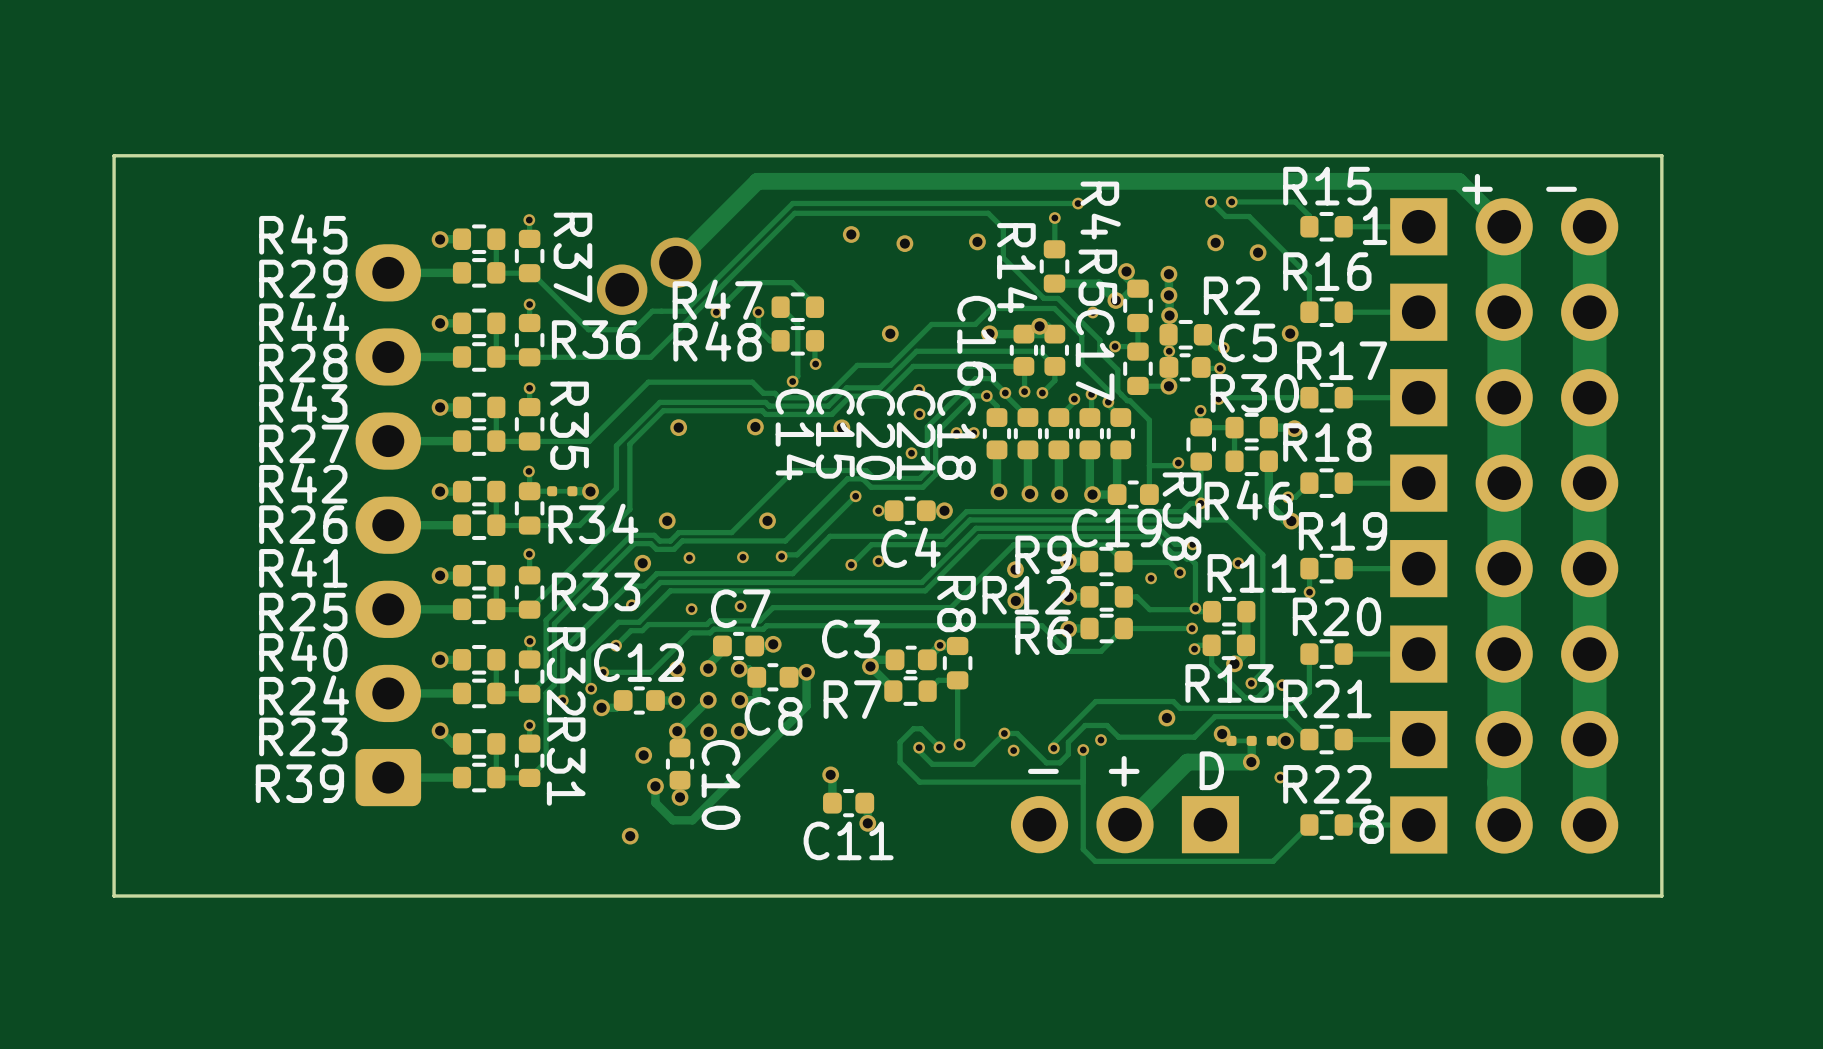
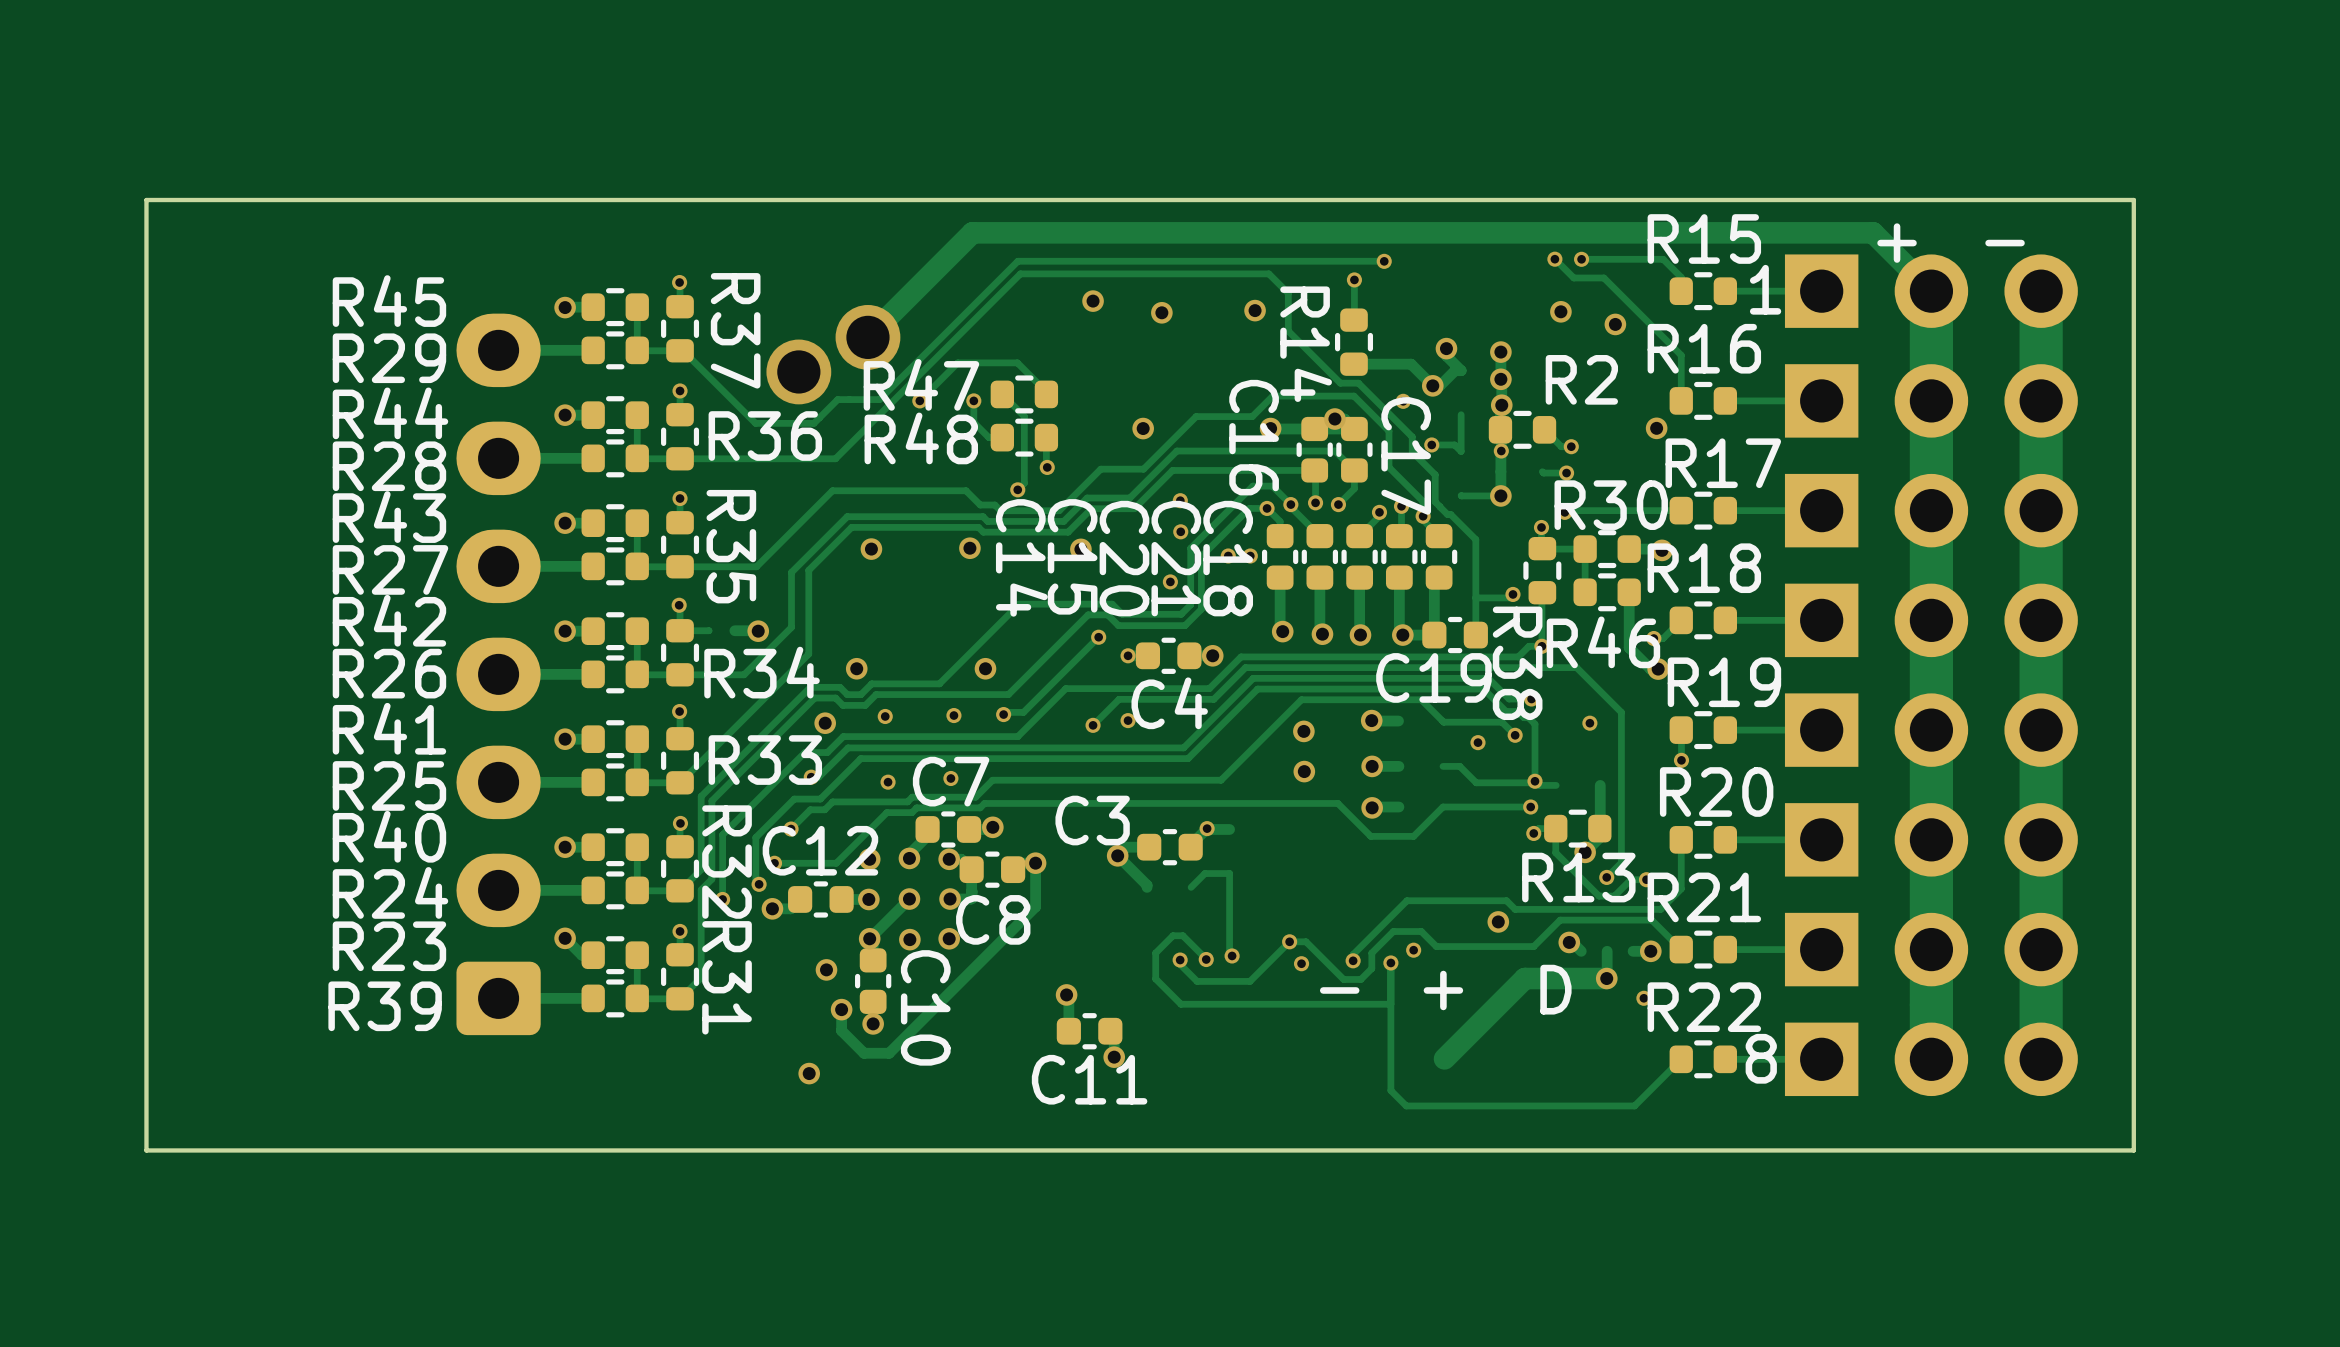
R4: (1137, 305) -> none
C5: (1185, 367) -> none
R5: (1137, 368) -> none
part: (562, 491) -> none
R9: (1106, 561) -> none
R12: (1106, 596) -> none
R11: (1229, 611) -> none
R6: (1106, 628) -> none
R8: (957, 663) -> none
R7: (910, 691) -> none
part: (1251, 740) -> none
part: (1125, 824) -> none

